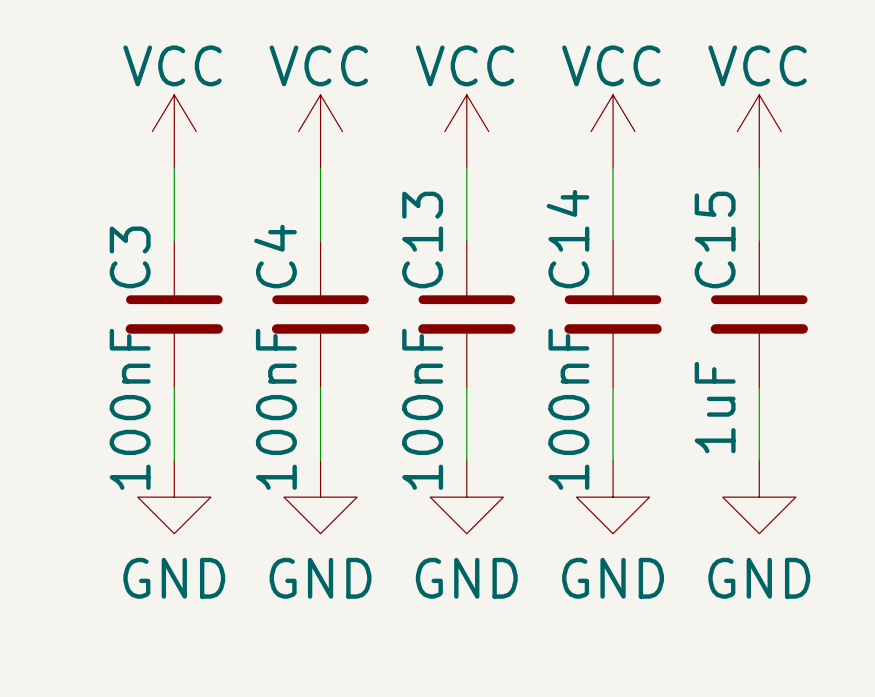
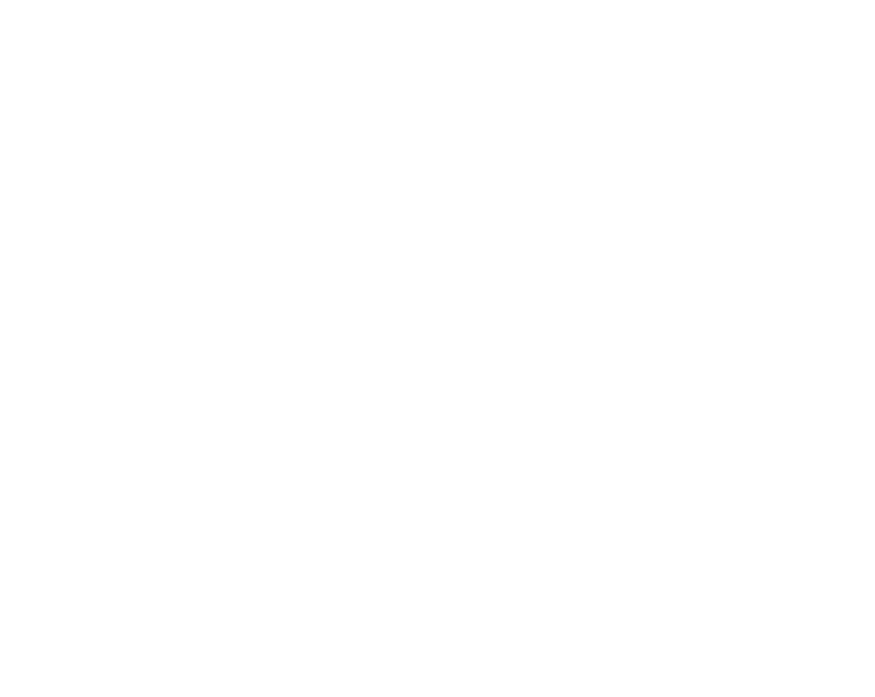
power symbol: VCC (174, 131) -> none
power symbol: VCC (320, 131) -> none
power symbol: VCC (466, 131) -> none
power symbol: VCC (613, 131) -> none
power symbol: VCC (759, 131) -> none
wire: (174, 168) (174, 241) -> none
wire: (320, 168) (320, 241) -> none
wire: (466, 168) (466, 241) -> none
wire: (613, 168) (613, 241) -> none
wire: (759, 168) (759, 241) -> none
C3: 100nF (174, 314) -> none
C4: 100nF (320, 314) -> none
C13: 100nF (466, 314) -> none
C14: 100nF (613, 314) -> none
C15: 1uF (759, 314) -> none
wire: (174, 387) (174, 460) -> none
wire: (320, 387) (320, 460) -> none
wire: (466, 387) (466, 460) -> none
wire: (613, 387) (613, 460) -> none
wire: (759, 387) (759, 460) -> none
power symbol: GND (174, 497) -> none
power symbol: GND (320, 497) -> none
power symbol: GND (466, 497) -> none
power symbol: GND (613, 497) -> none
power symbol: GND (759, 497) -> none

